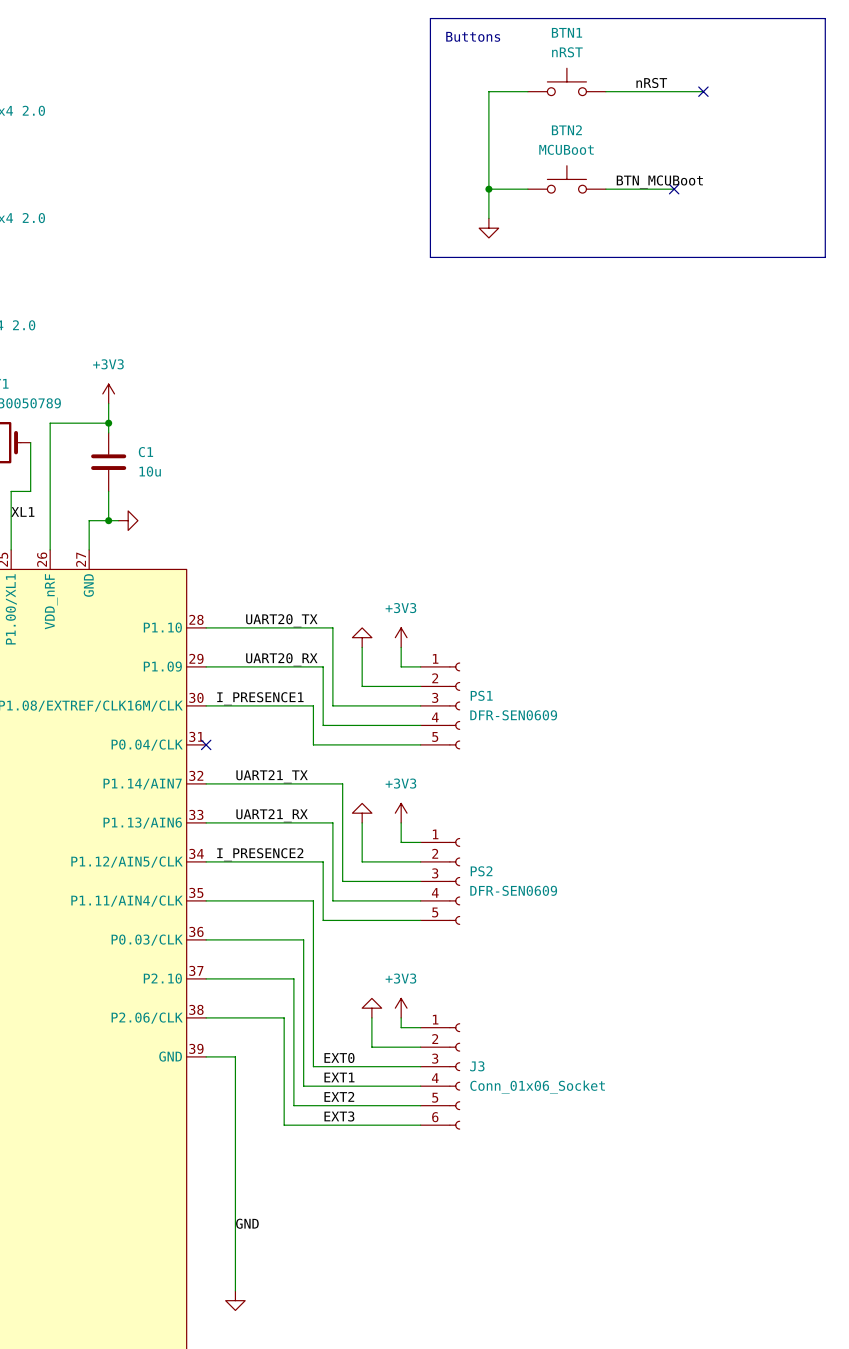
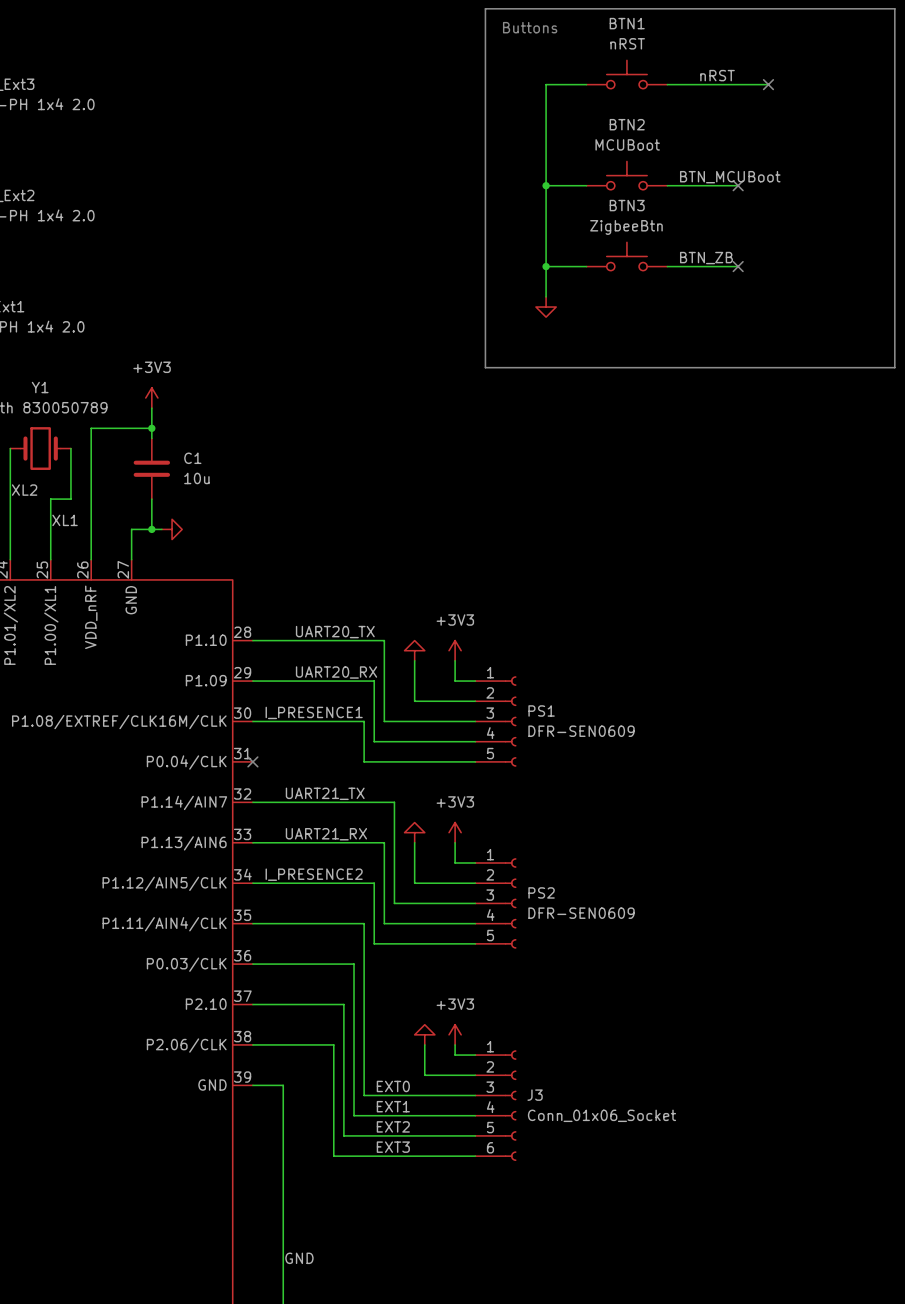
wire: none -> (546, 216) (546, 296)
power symbol position: (488, 228) -> (546, 307)
line: (430, 257) (825, 257) -> (485, 256) (485, 367) (894, 367) (894, 256)
BTN3: none -> ZigbeeBtn (626, 256)
label: none -> BTN_ZB (706, 258)
wire: none -> (546, 266) (586, 266)
junction: none -> (546, 266)
wire: none -> (667, 266) (738, 266)
no-connect mark: none -> (738, 266)

